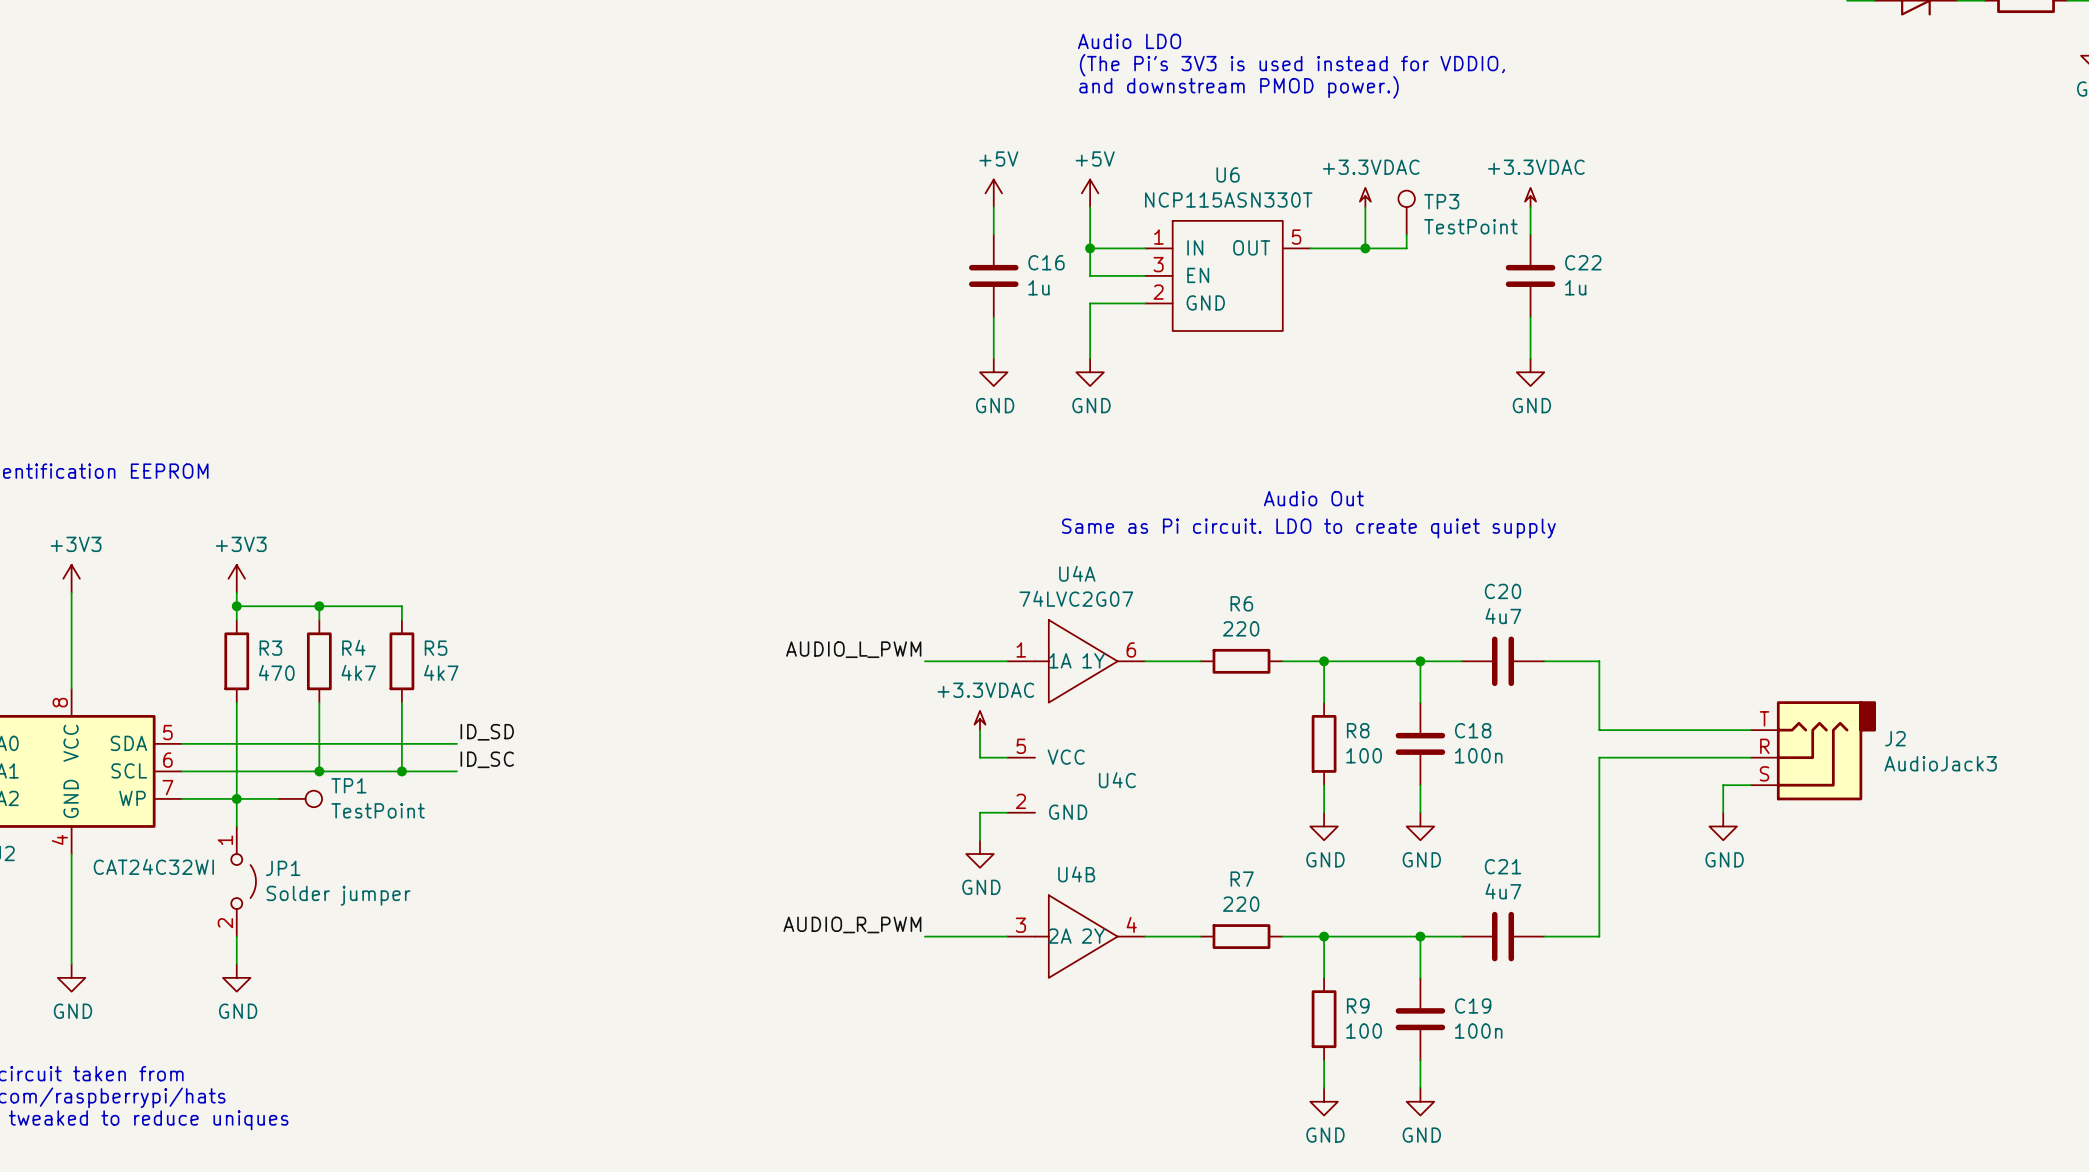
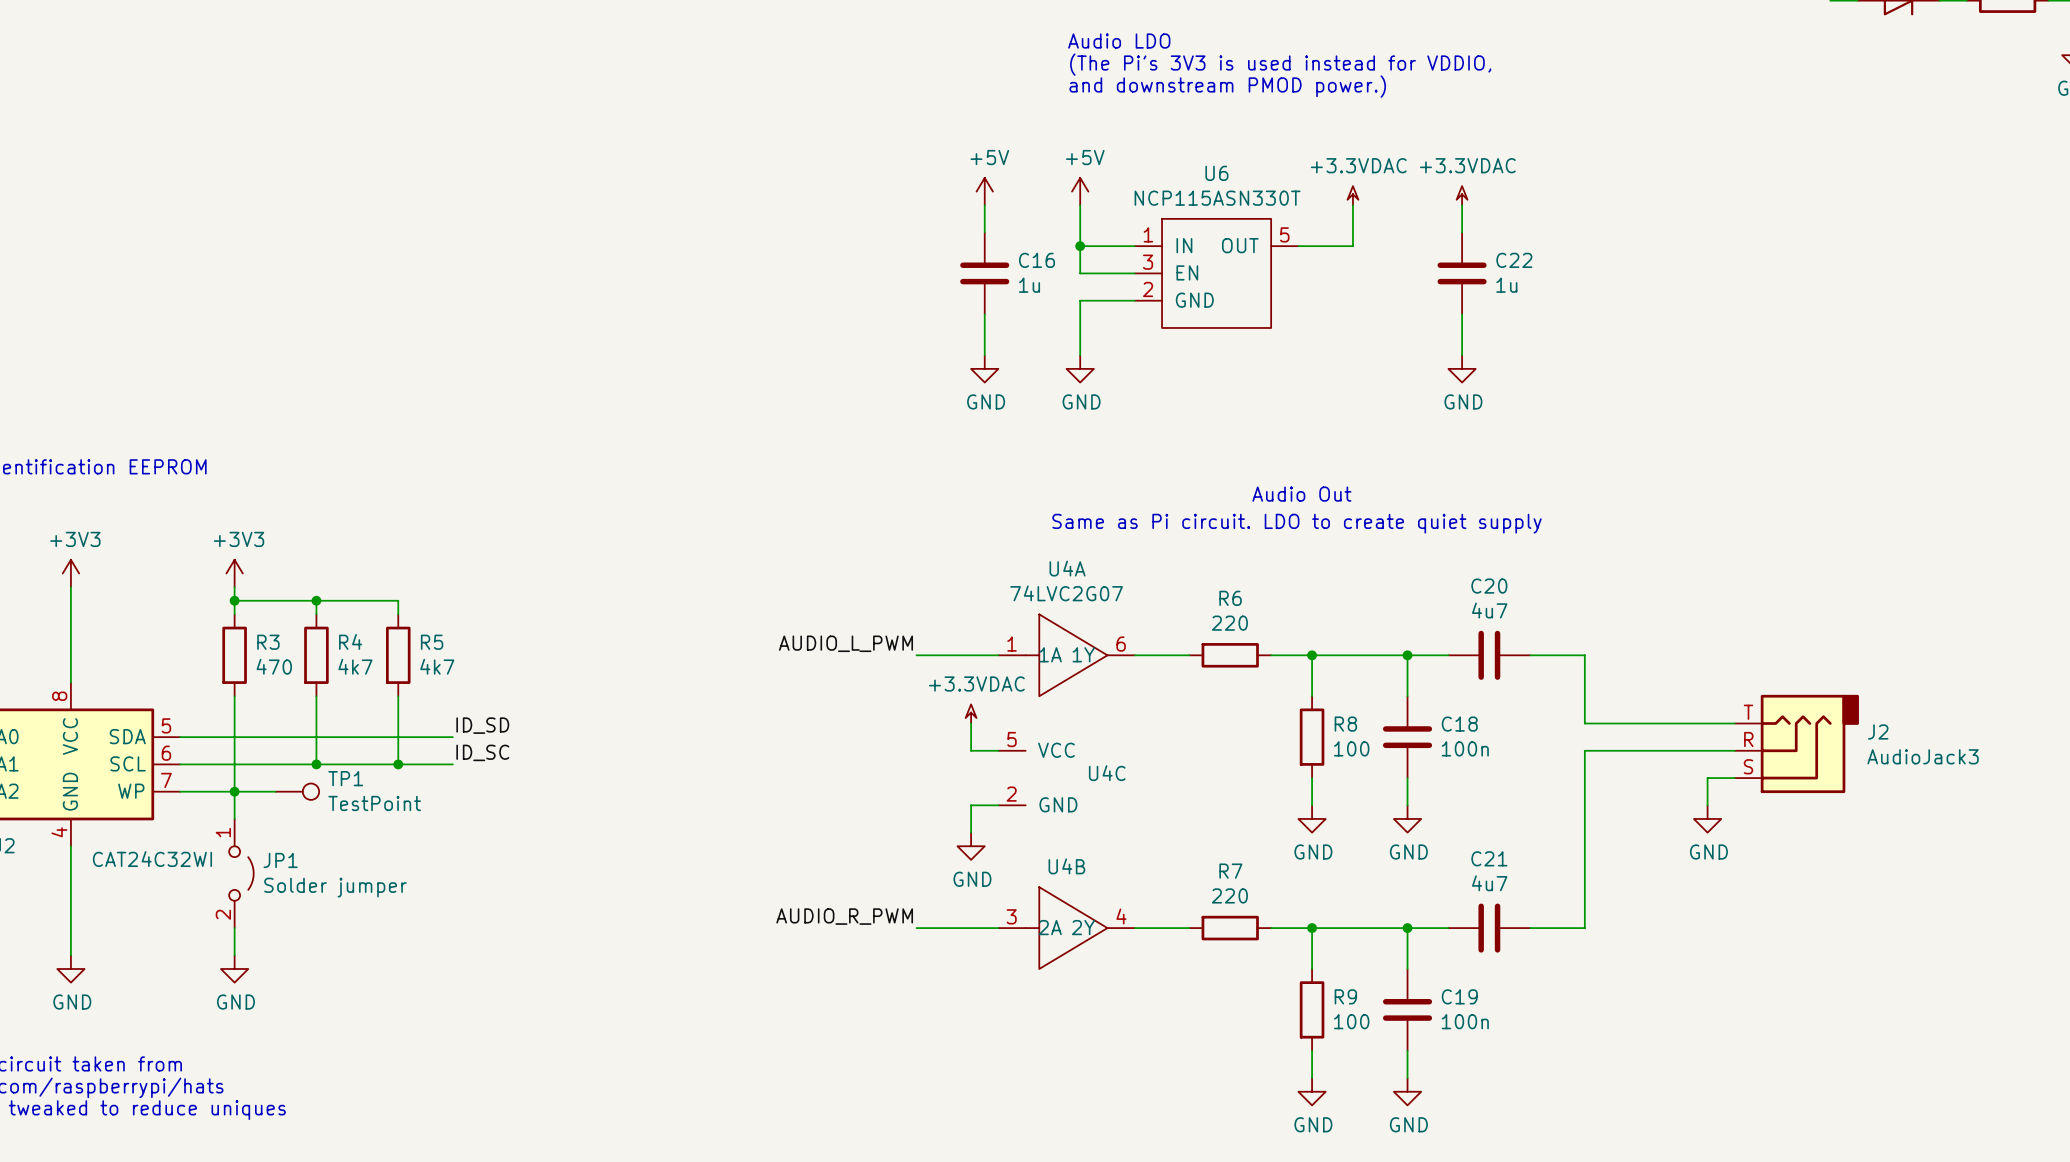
power symbol position: +3.3VDAC (1530, 197) -> +3.3VDAC (1462, 195)
wire: (1530, 207) (1530, 234) -> (1462, 205) (1462, 232)
TP3: TestPoint (1406, 212) -> none
wire: (1406, 234) (1406, 248) (1365, 248) -> none
junction: (1365, 248) -> none
C22 position: (1530, 275) -> (1462, 273)
wire: (1530, 317) (1530, 358) -> (1462, 314) (1462, 355)
power symbol position: GND (1530, 372) -> GND (1462, 368)

